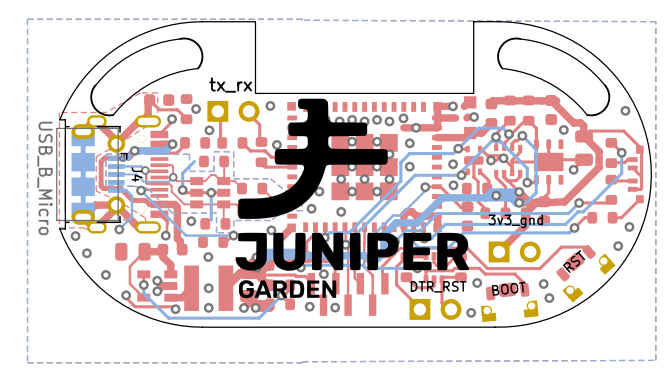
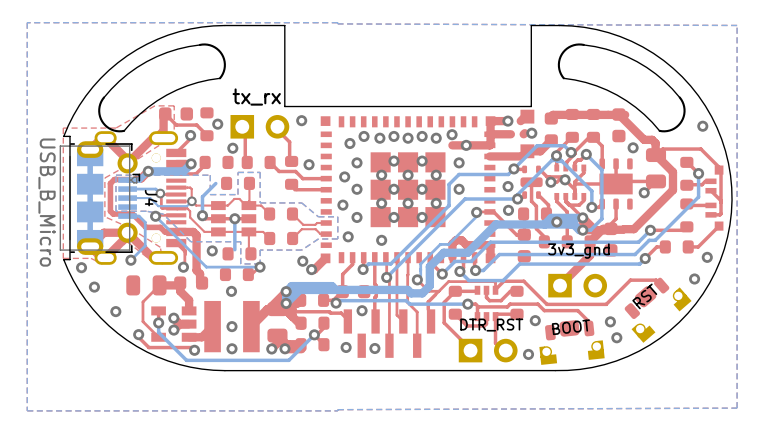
drawing: [235, 98, 469, 299] -> none

